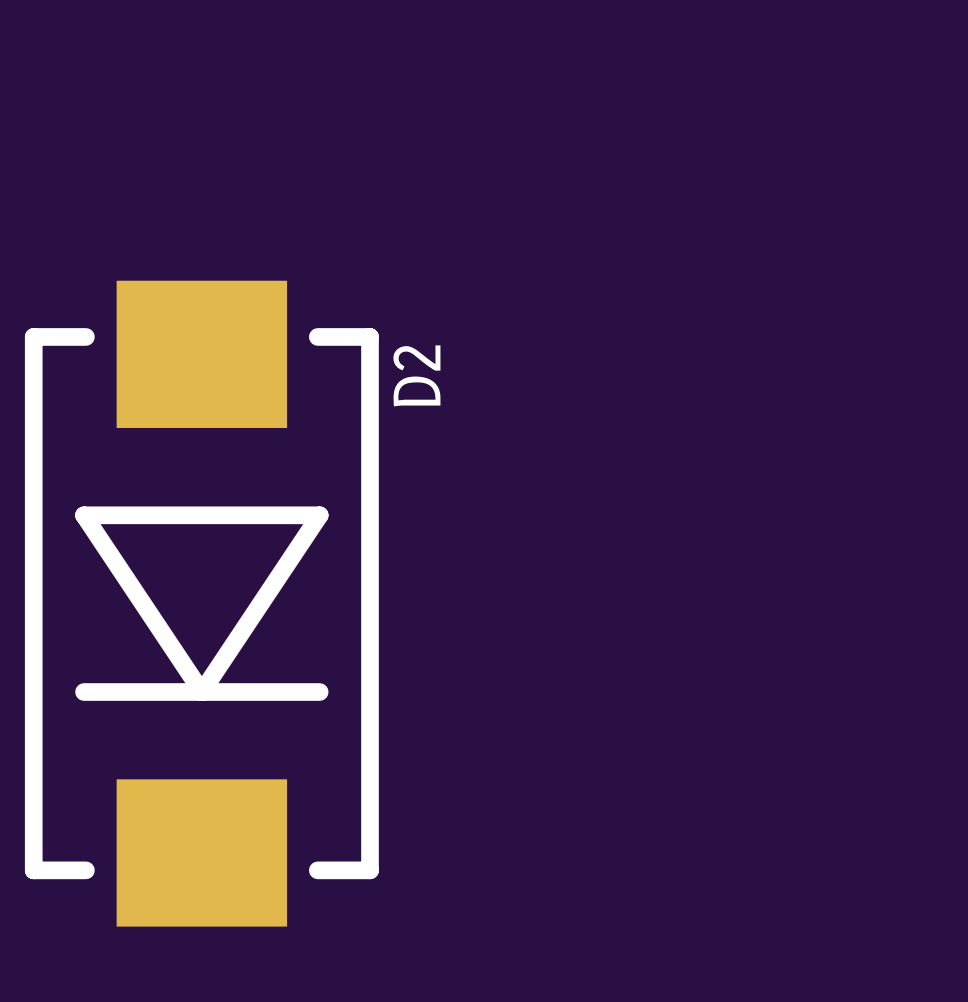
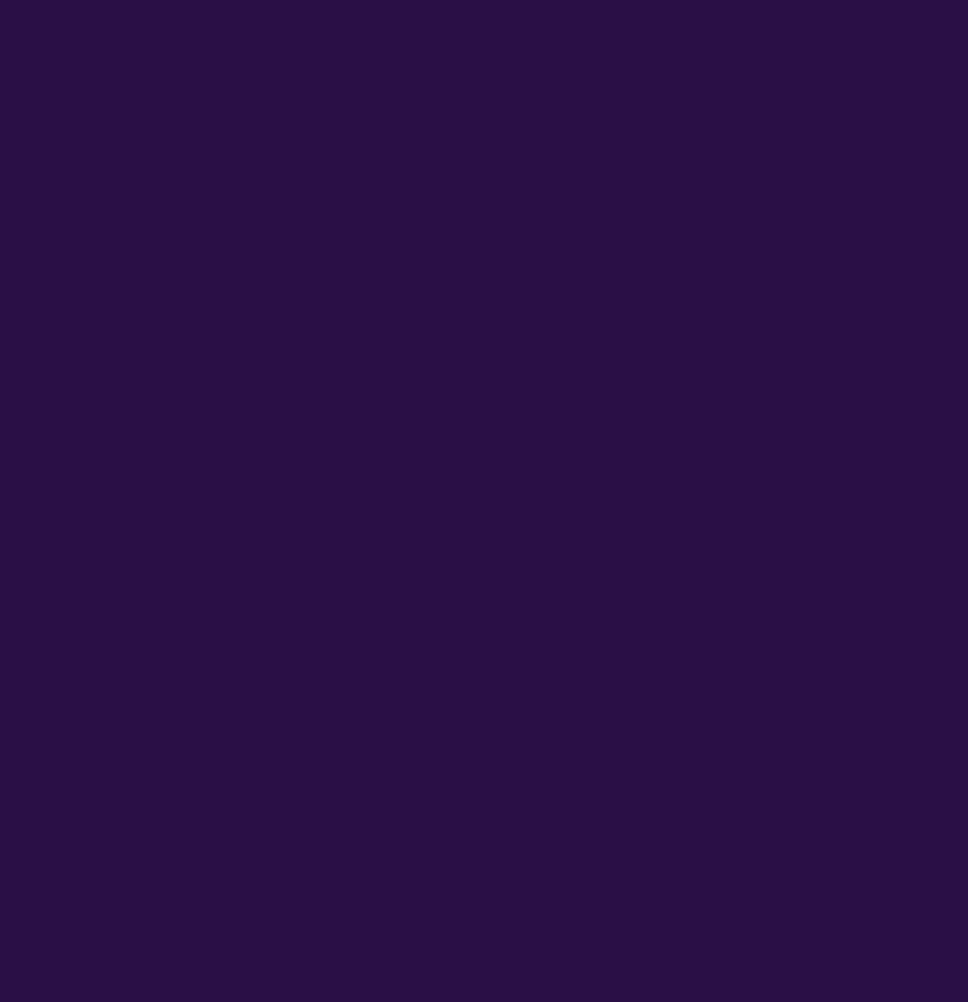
D2: (201, 603) -> none

